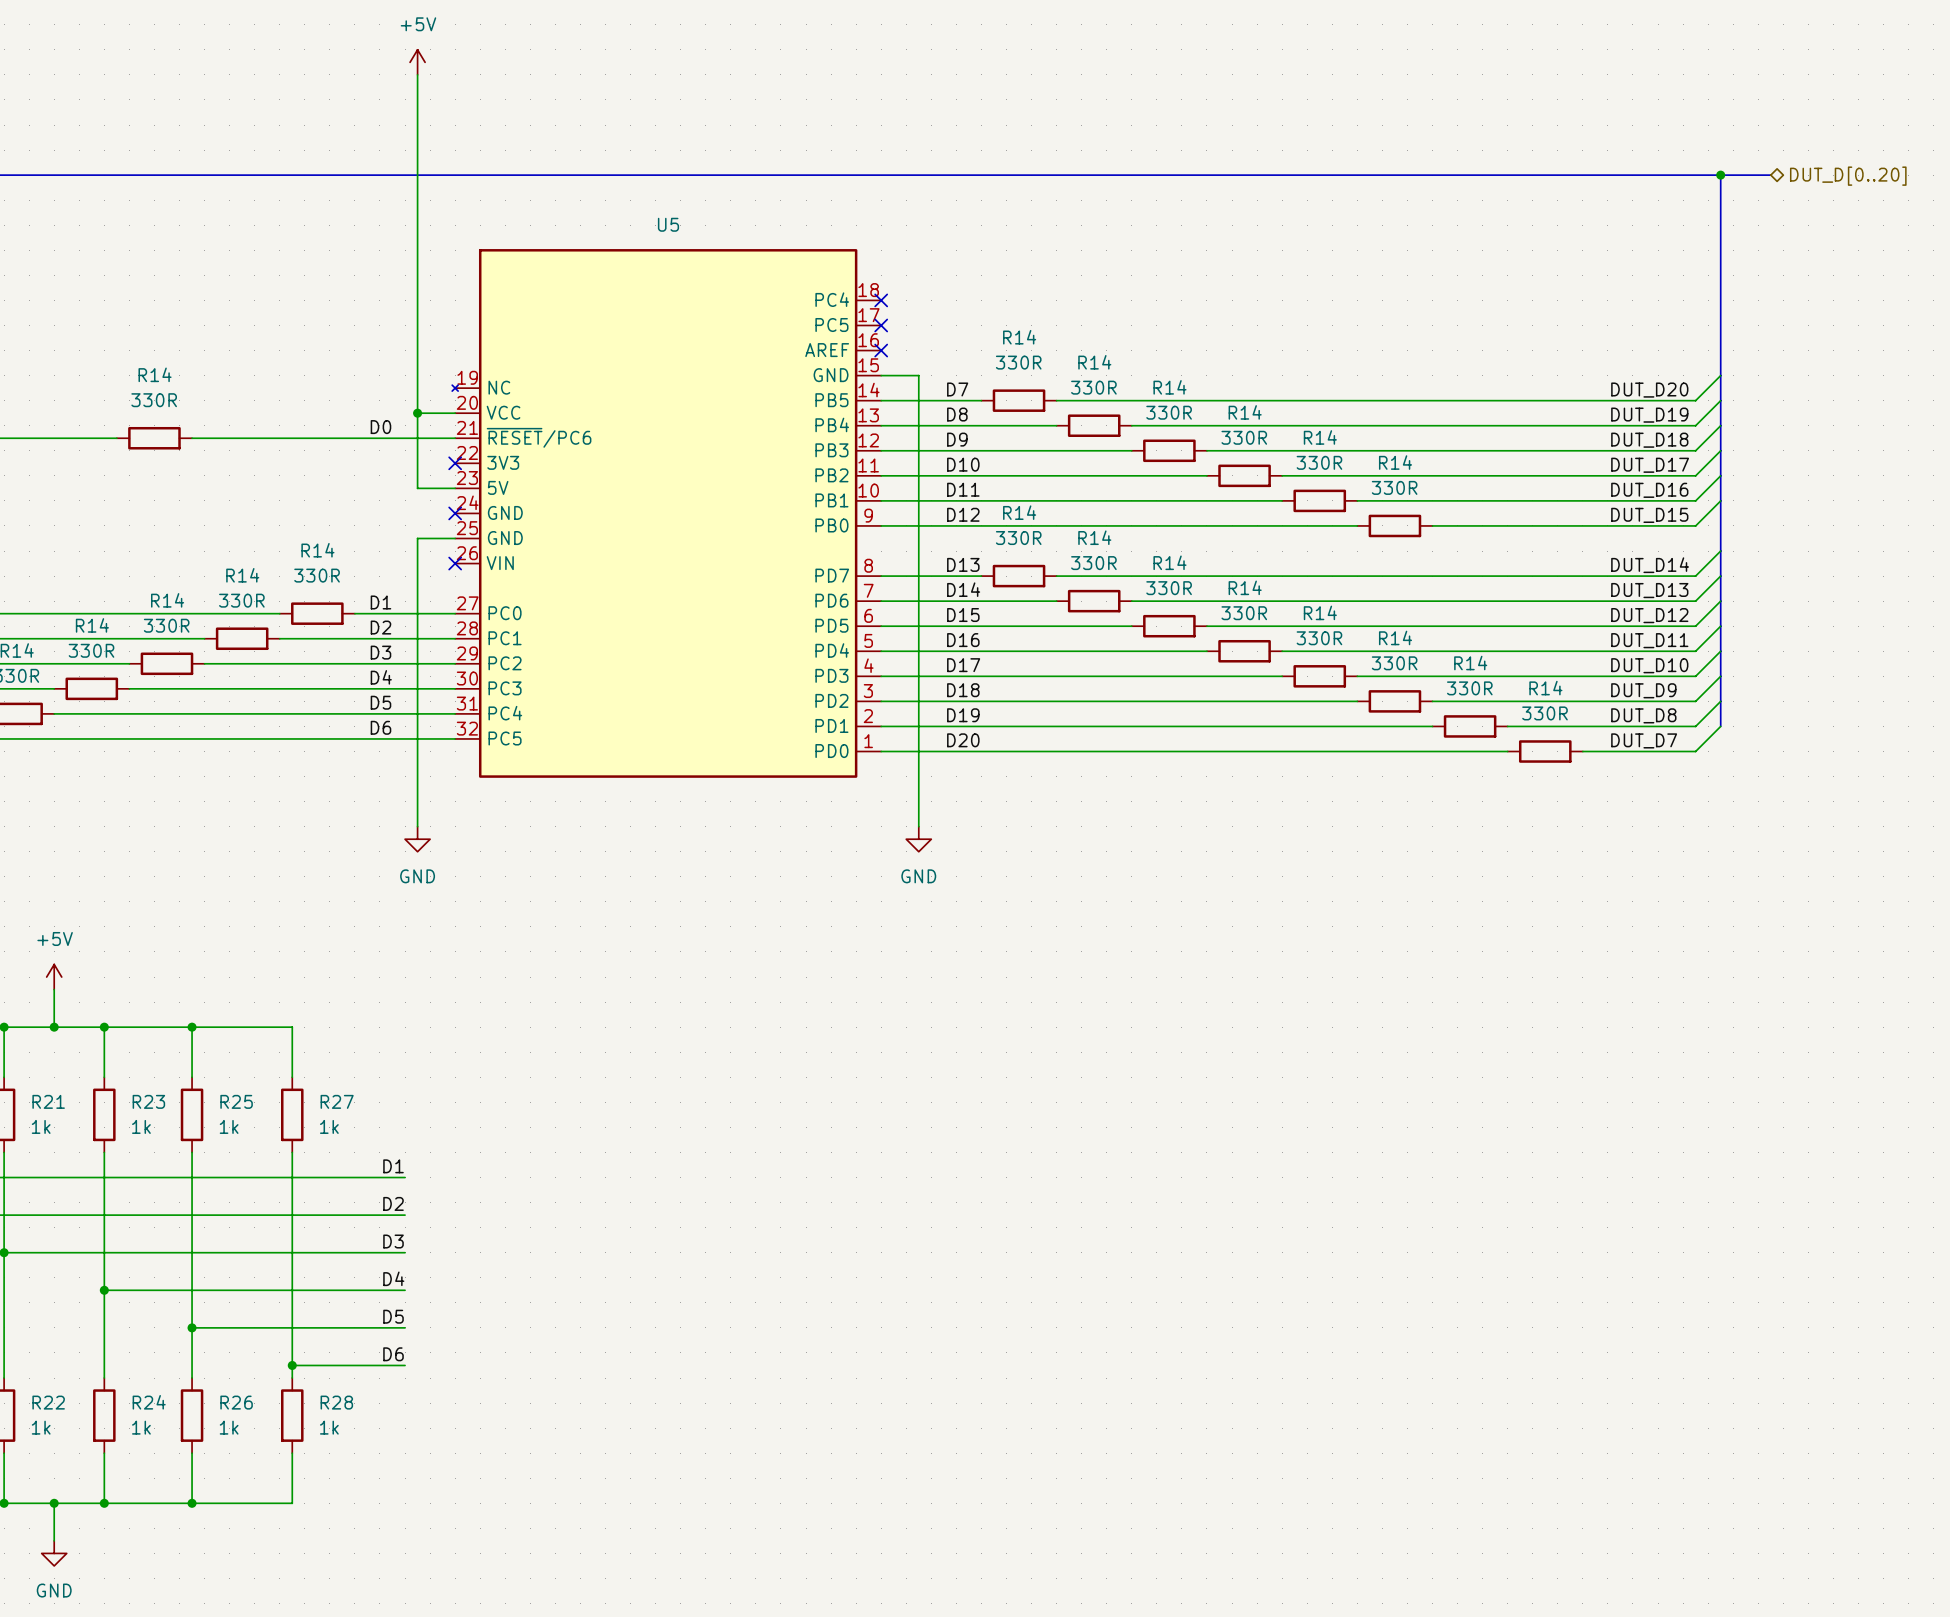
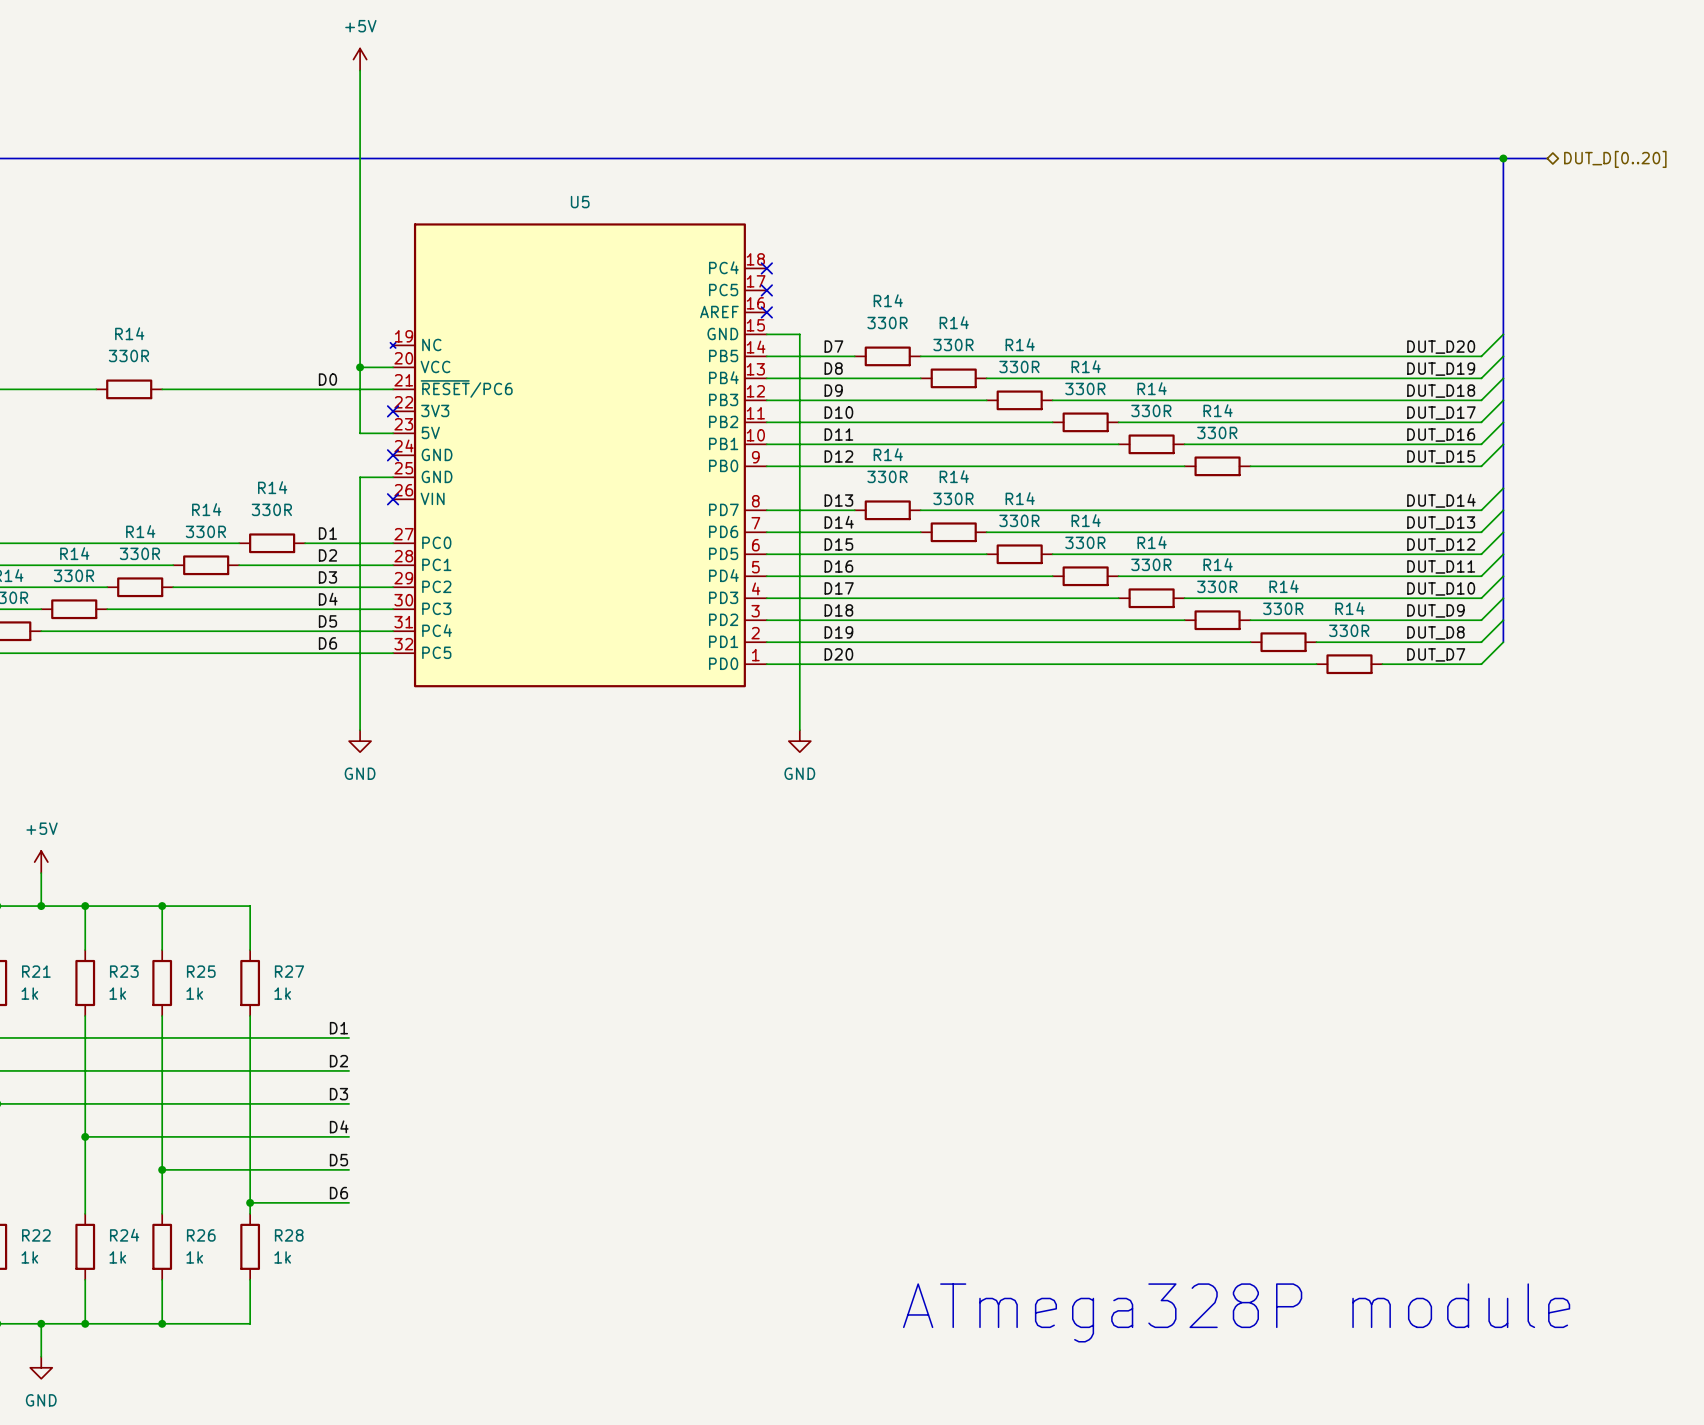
text: none -> ATmega328P module (1236, 1312)

